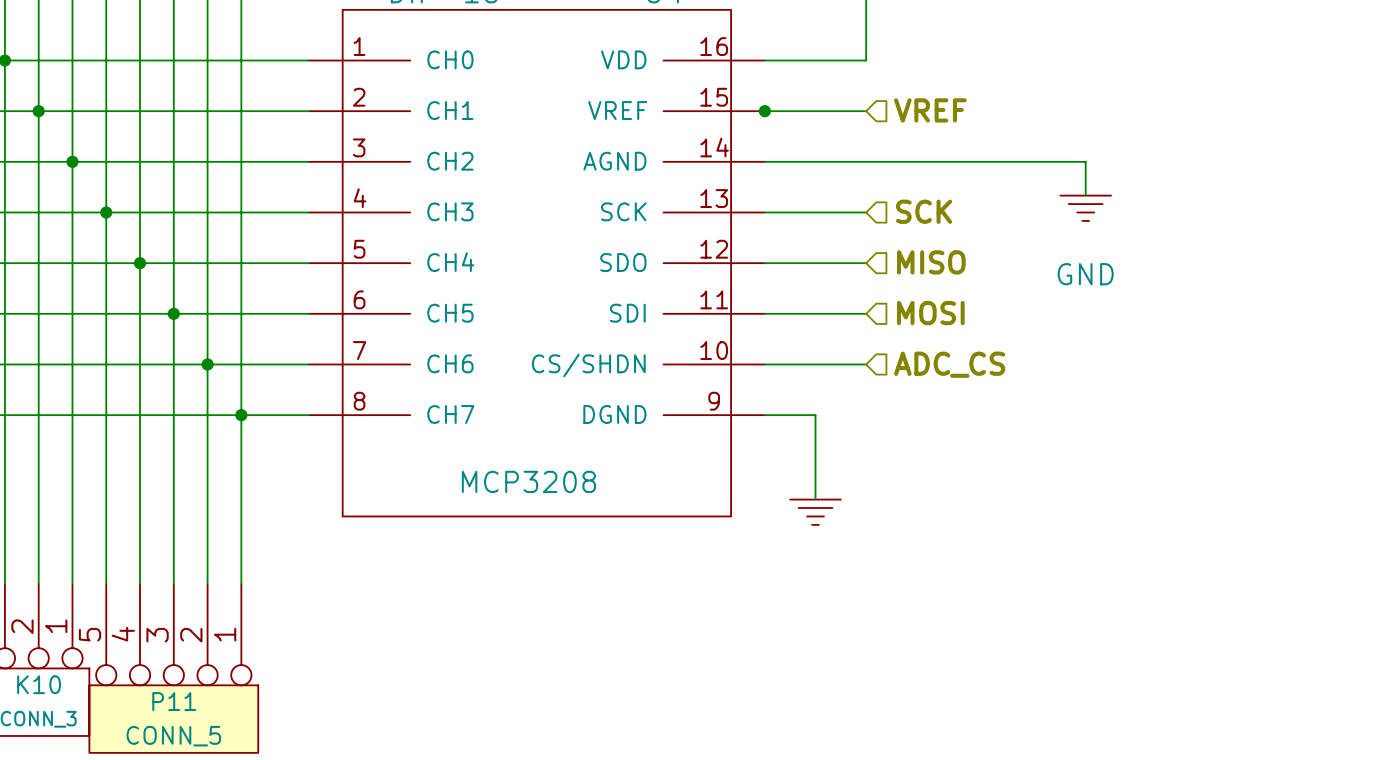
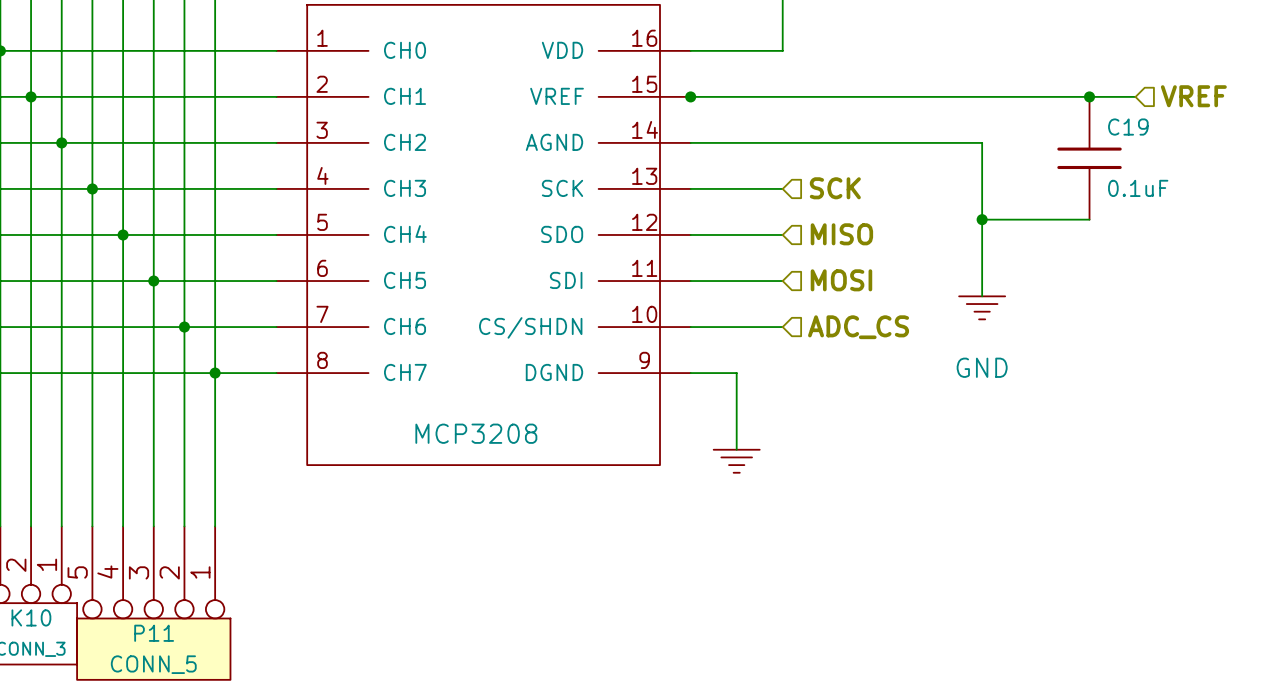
hierarchical label: VREF (930, 110) -> none
hierarchical label: none -> VREF (1193, 96)
wire: none -> (782, 96) (1135, 96)
junction: none -> (1089, 96)
C19: none -> 0.1uF (1089, 158)
wire: none -> (982, 173) (982, 296)
power symbol position: GND (1085, 208) -> GND (982, 307)
wire: none -> (982, 219) (1089, 219)
junction: none -> (982, 219)

